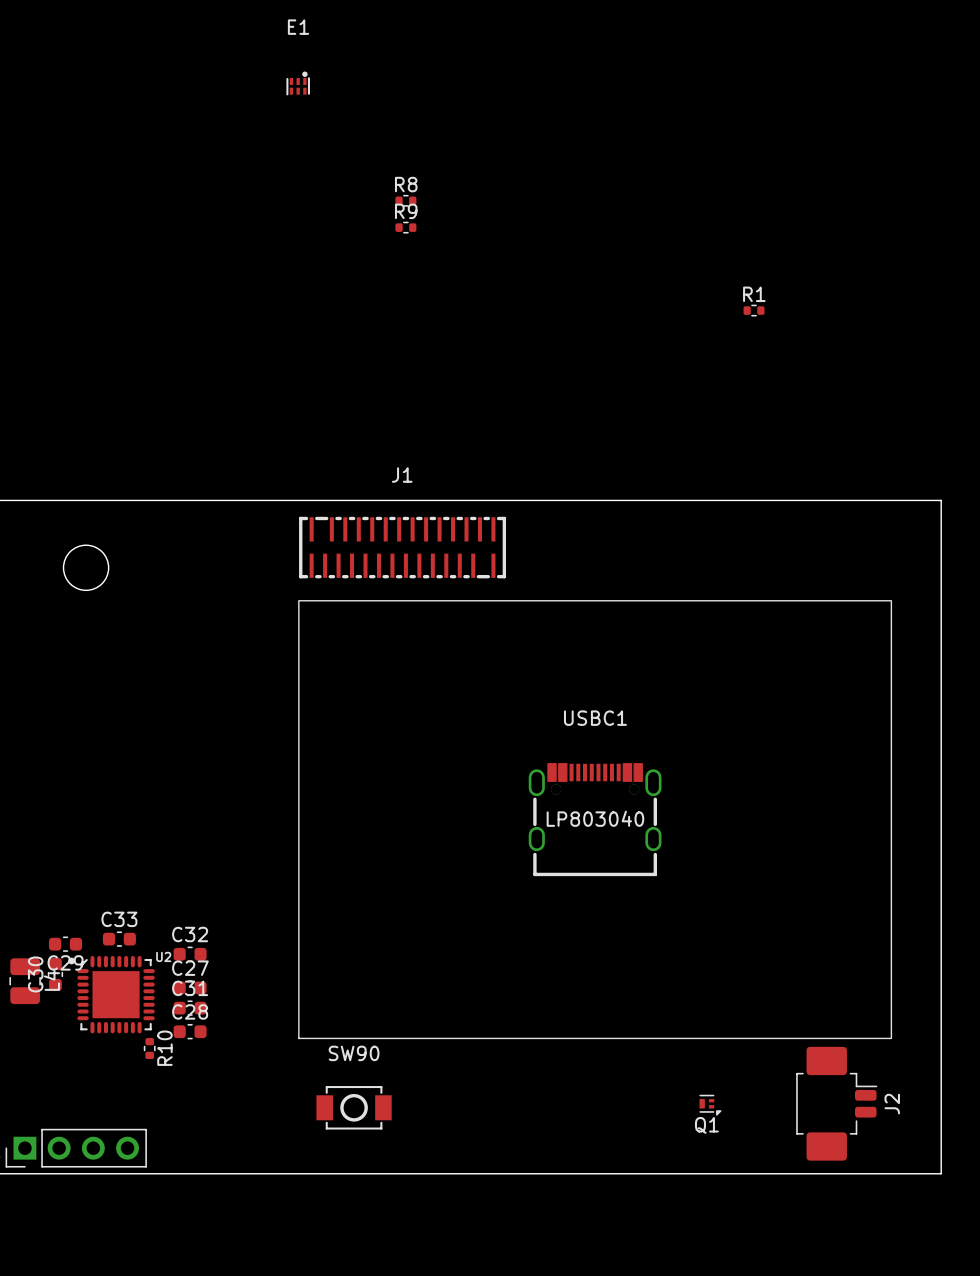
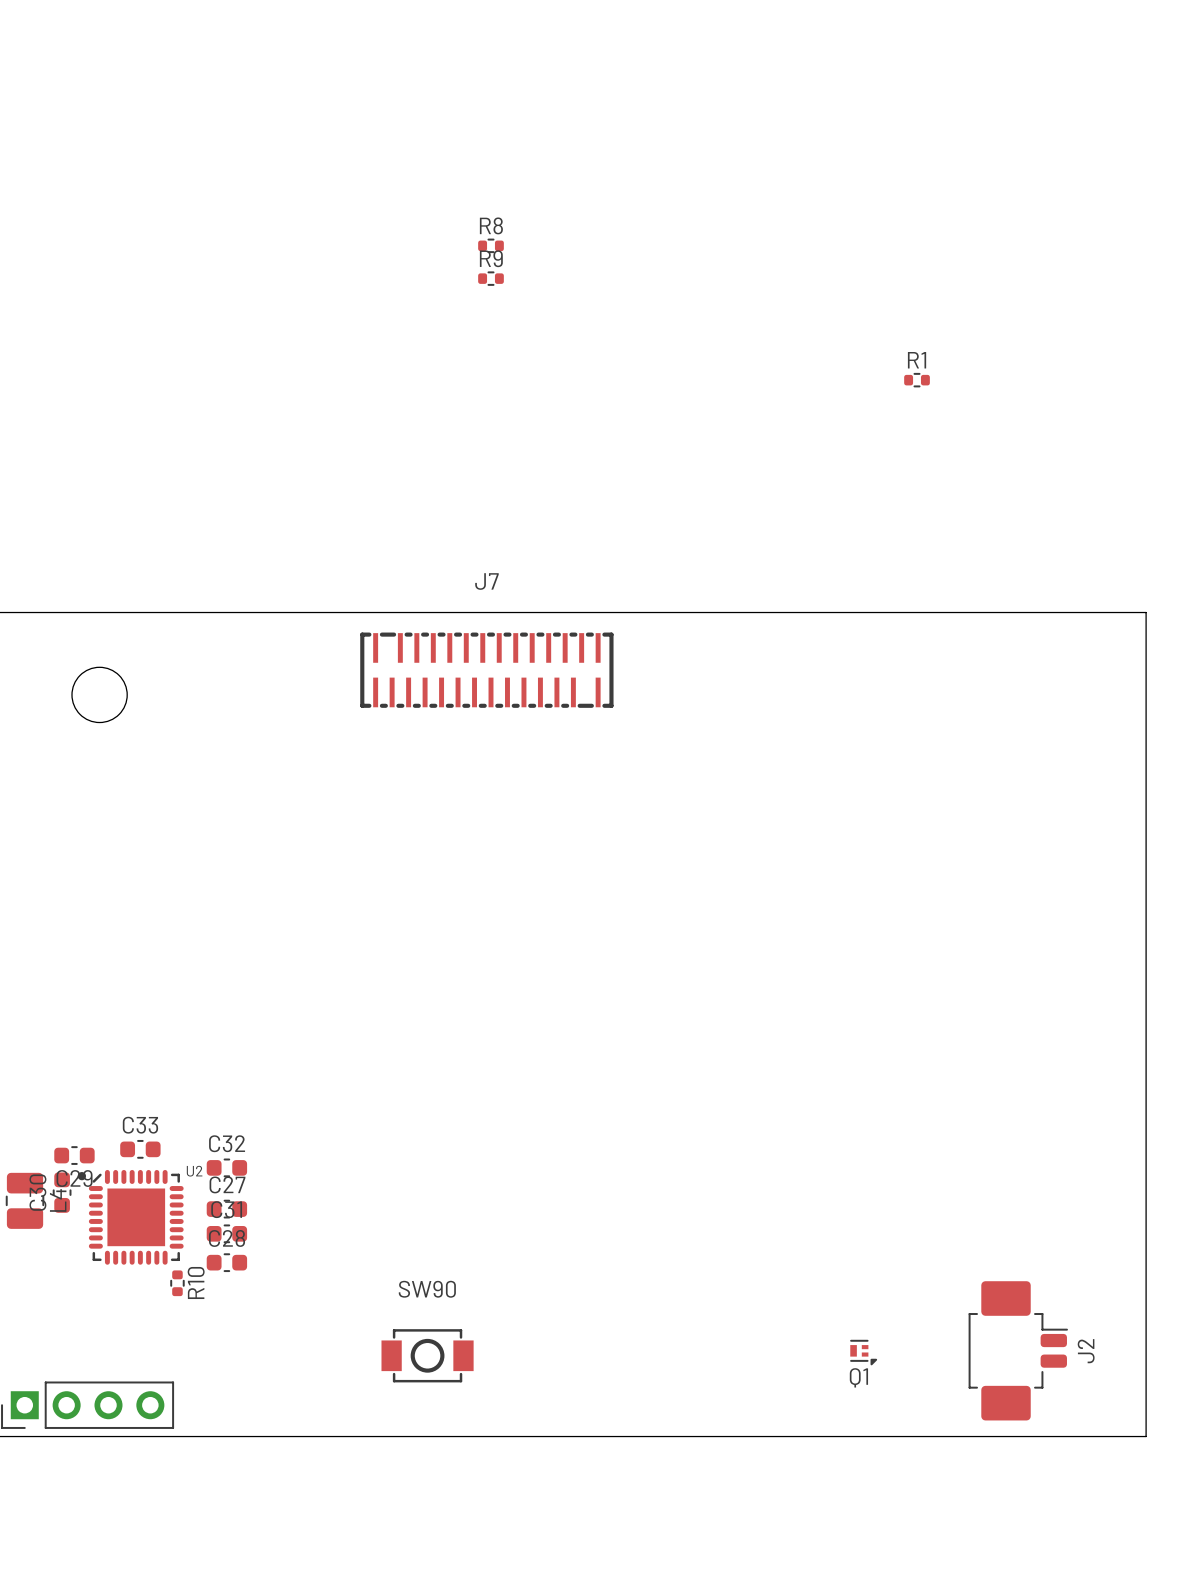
E1: (298, 83) -> none
J1 name: J1 (402, 475) -> J7 (486, 581)
drawing: [298, 600, 893, 1040] -> none
USBC1: (595, 819) -> none

